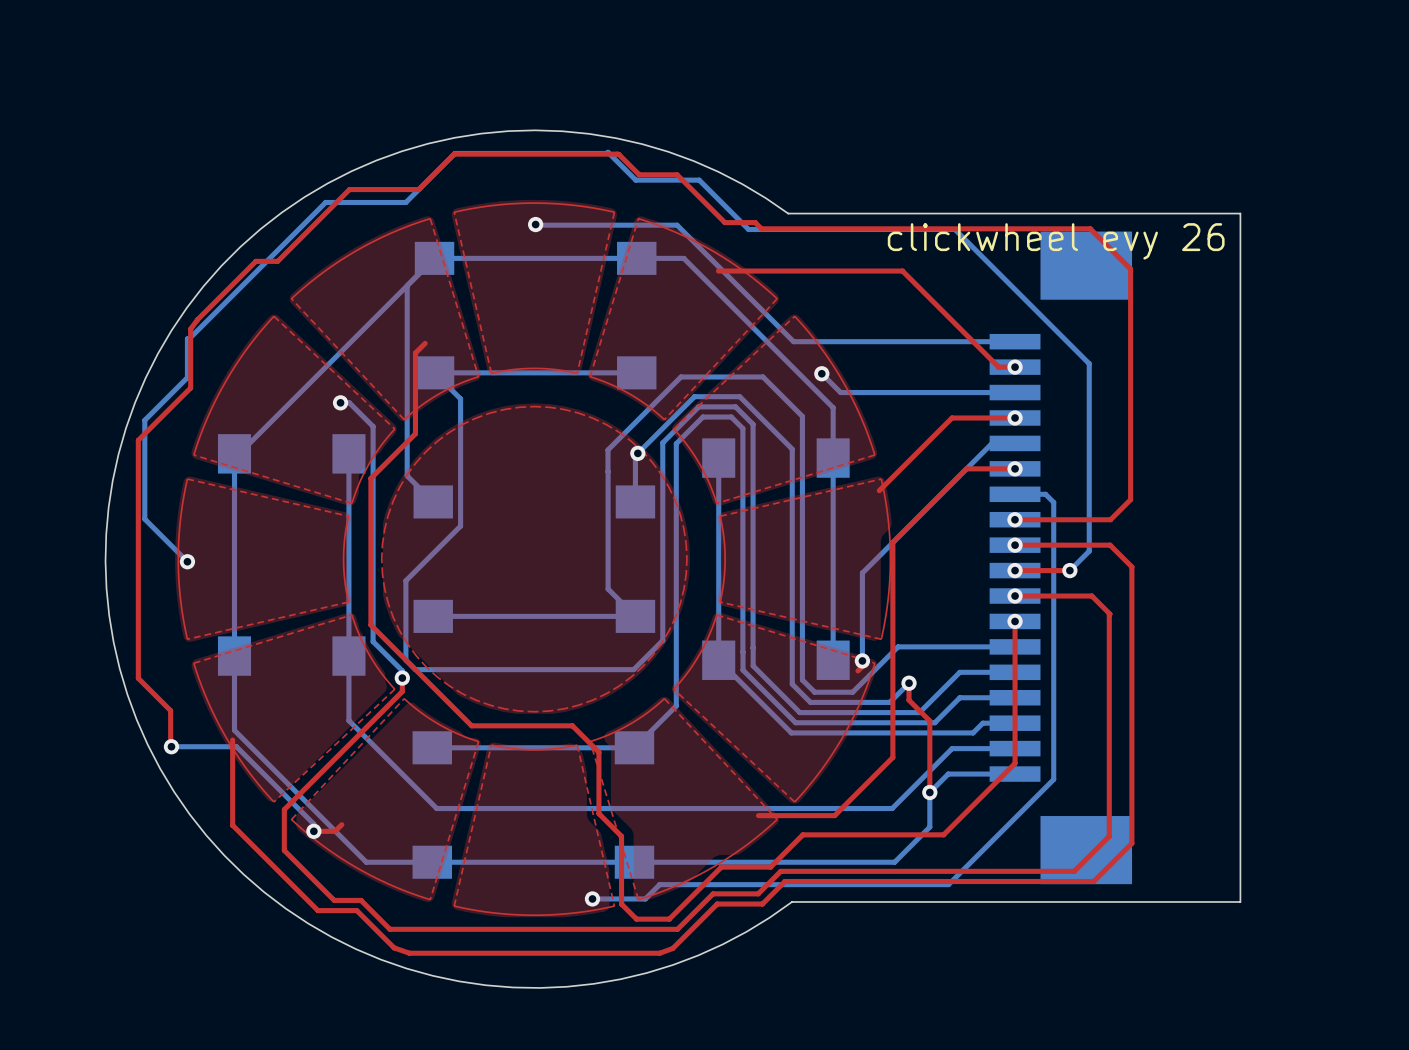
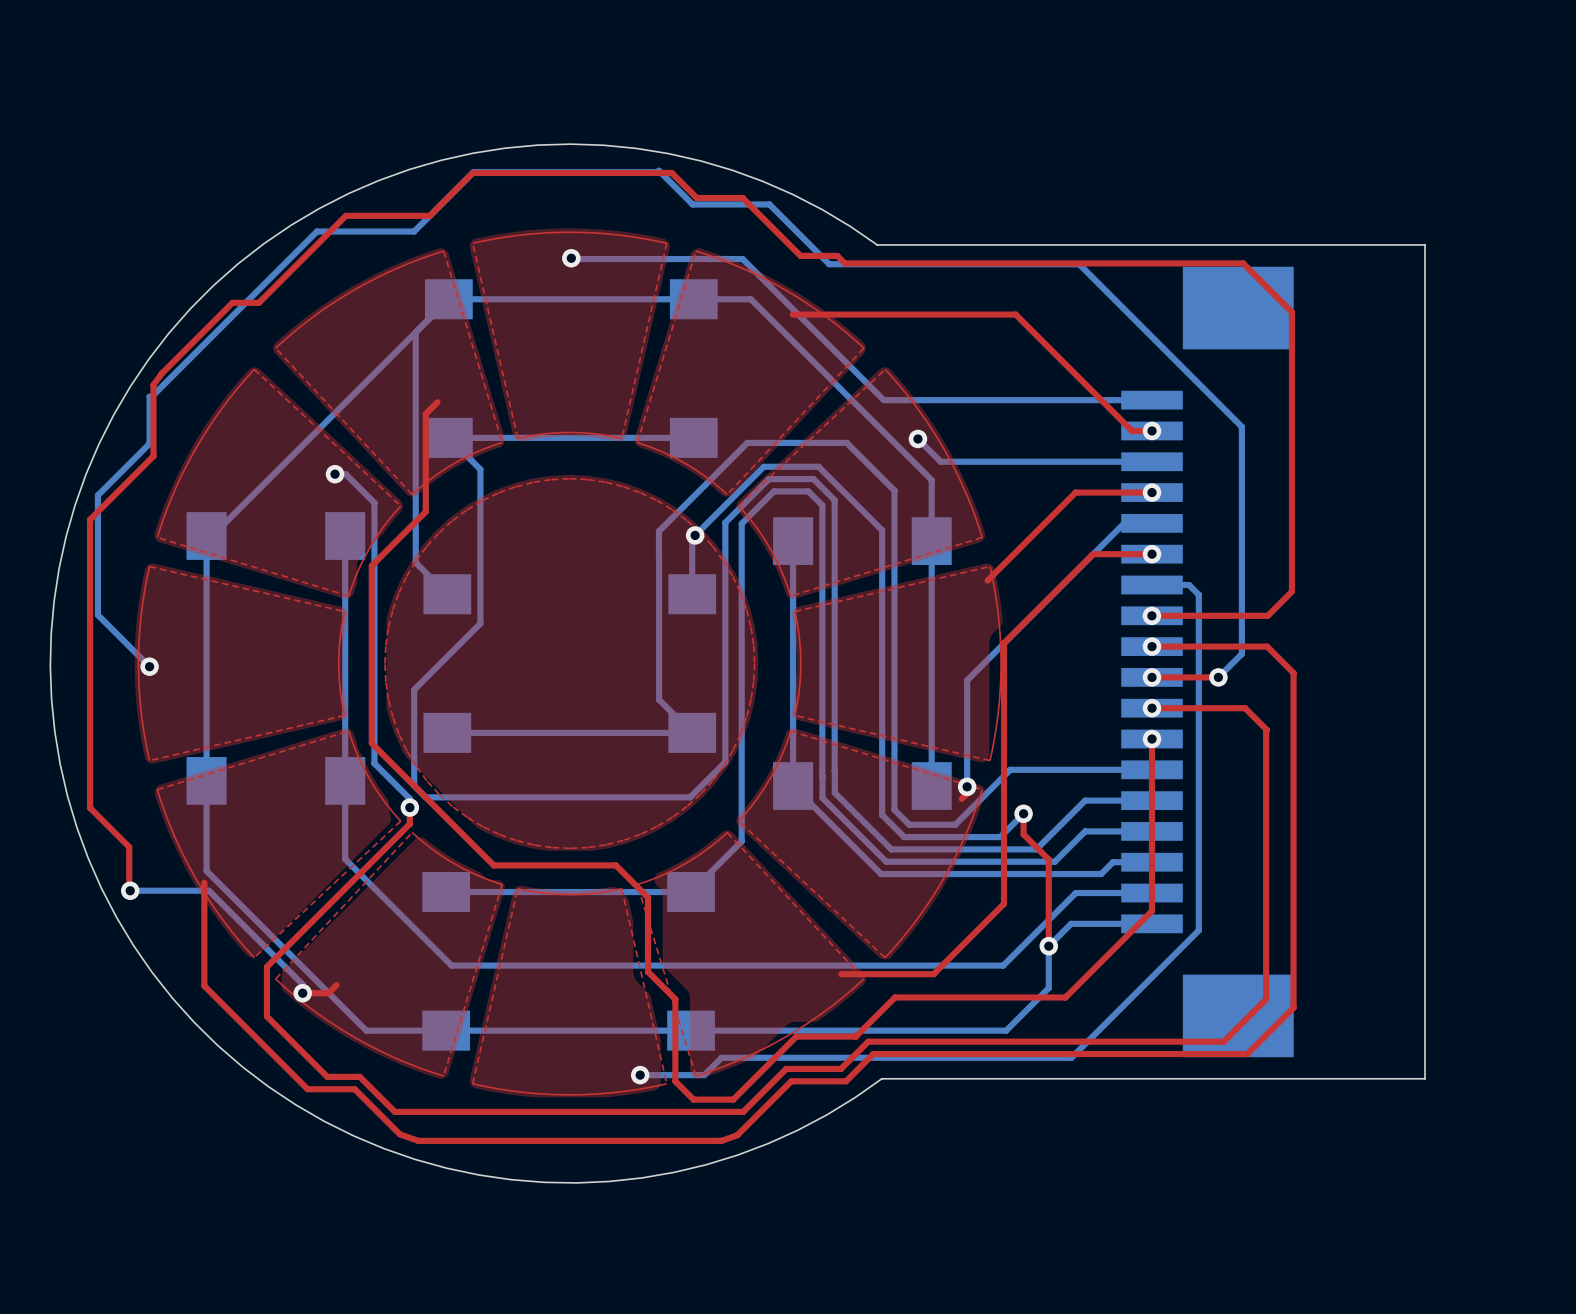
text: clickwheel evy 26 (1056, 241) -> none

